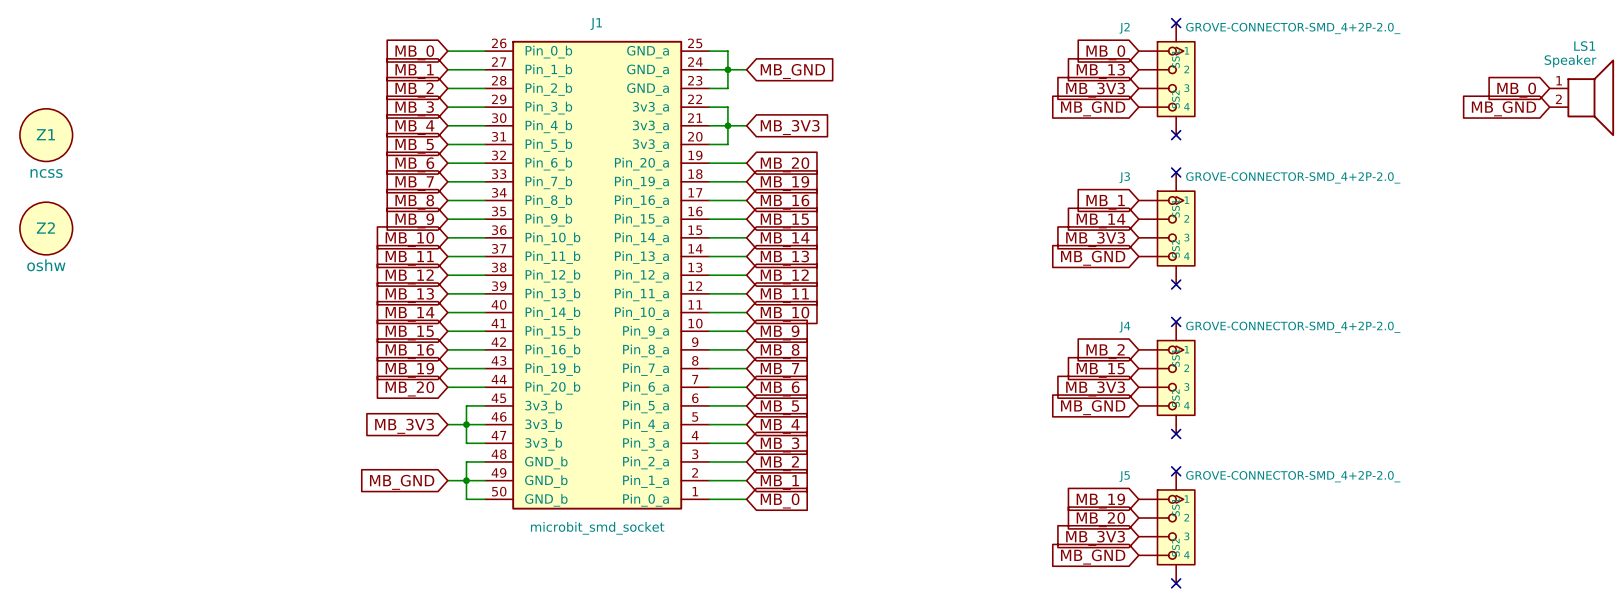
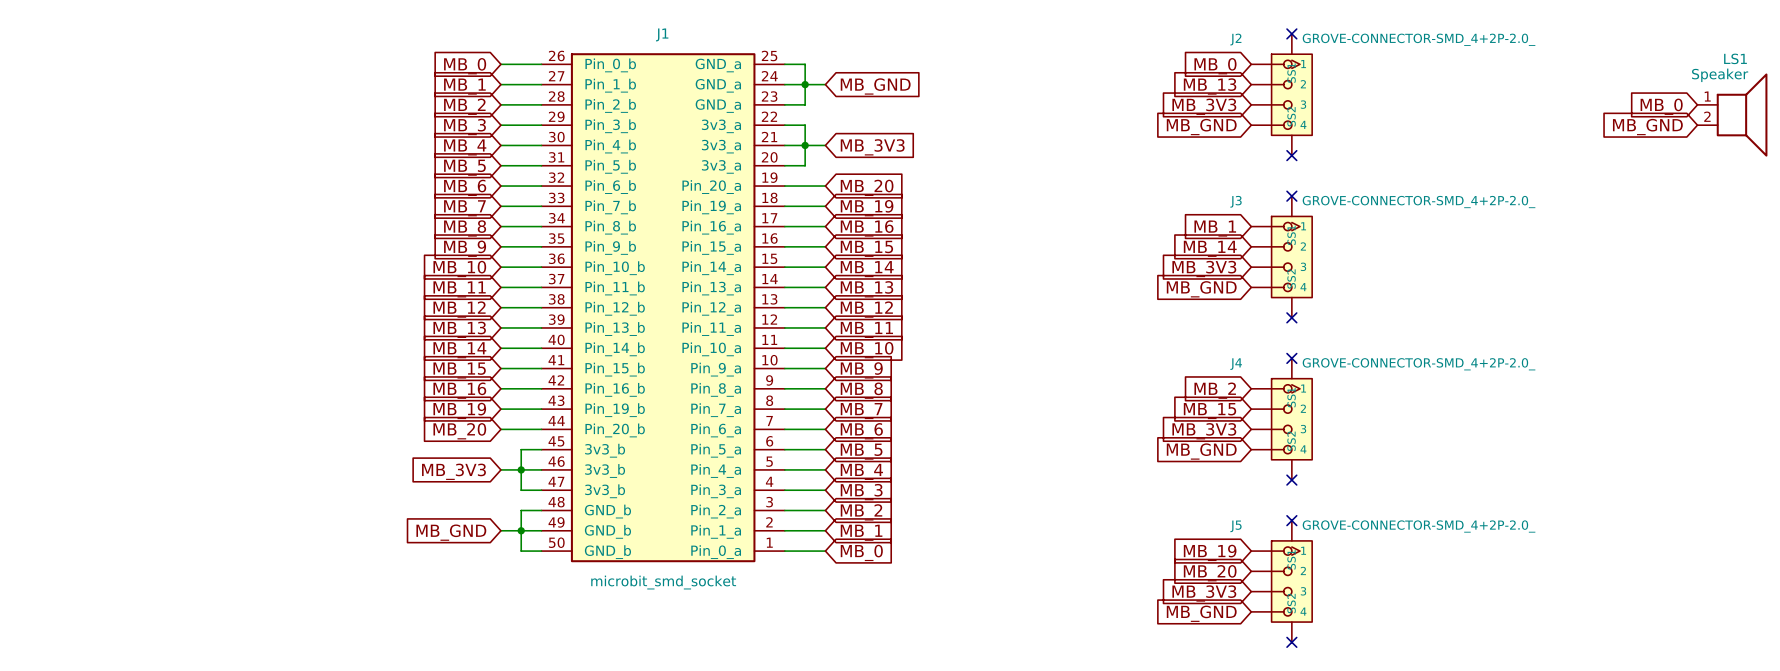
Z1: ncss (46, 135) -> none
Z2: oshw (46, 228) -> none

